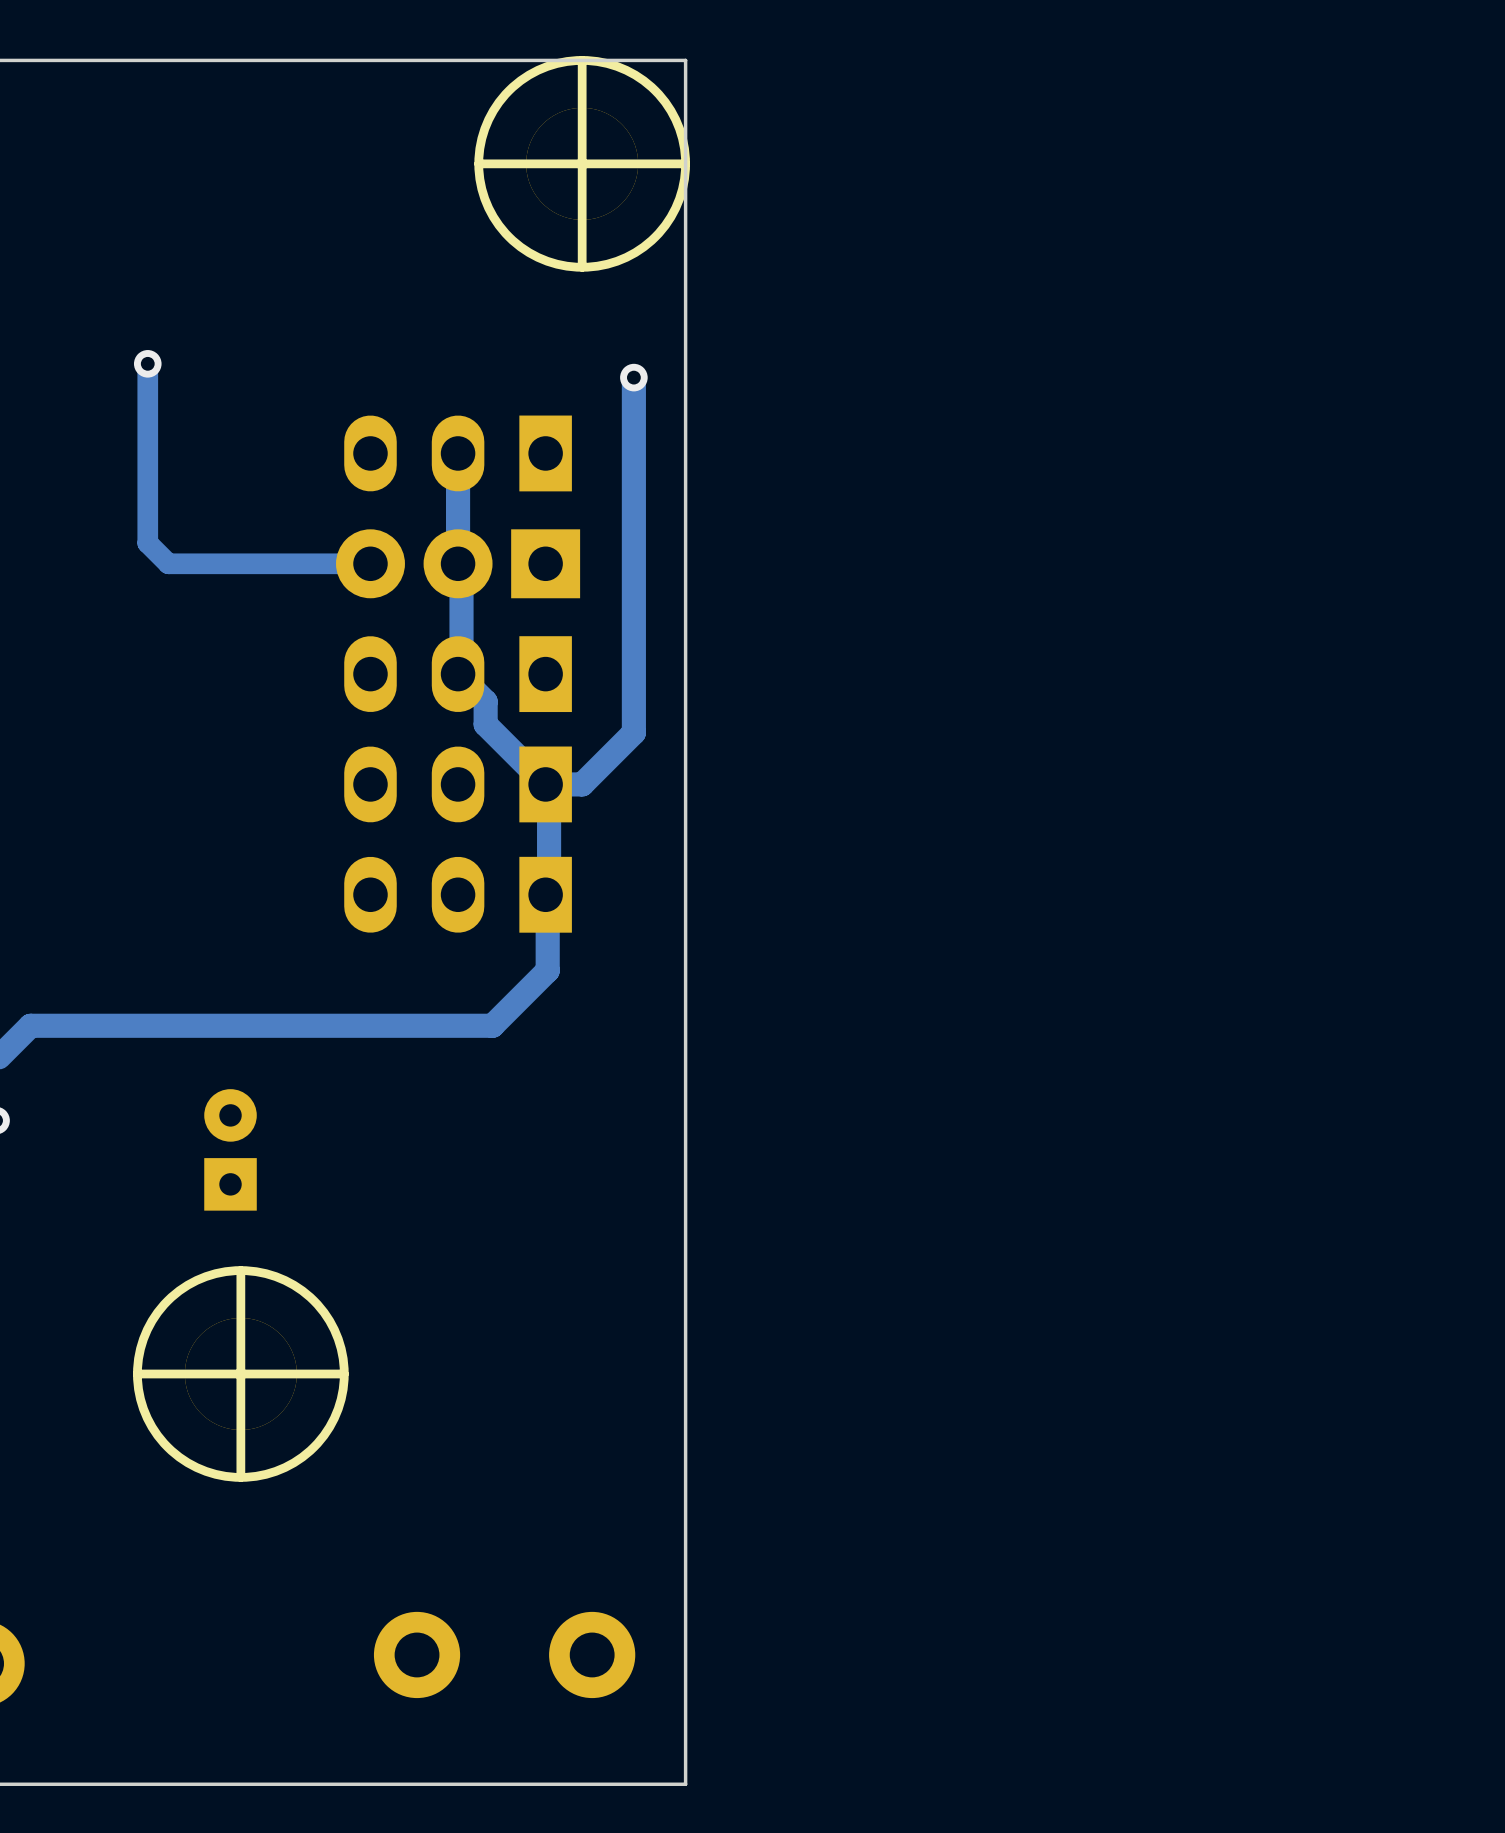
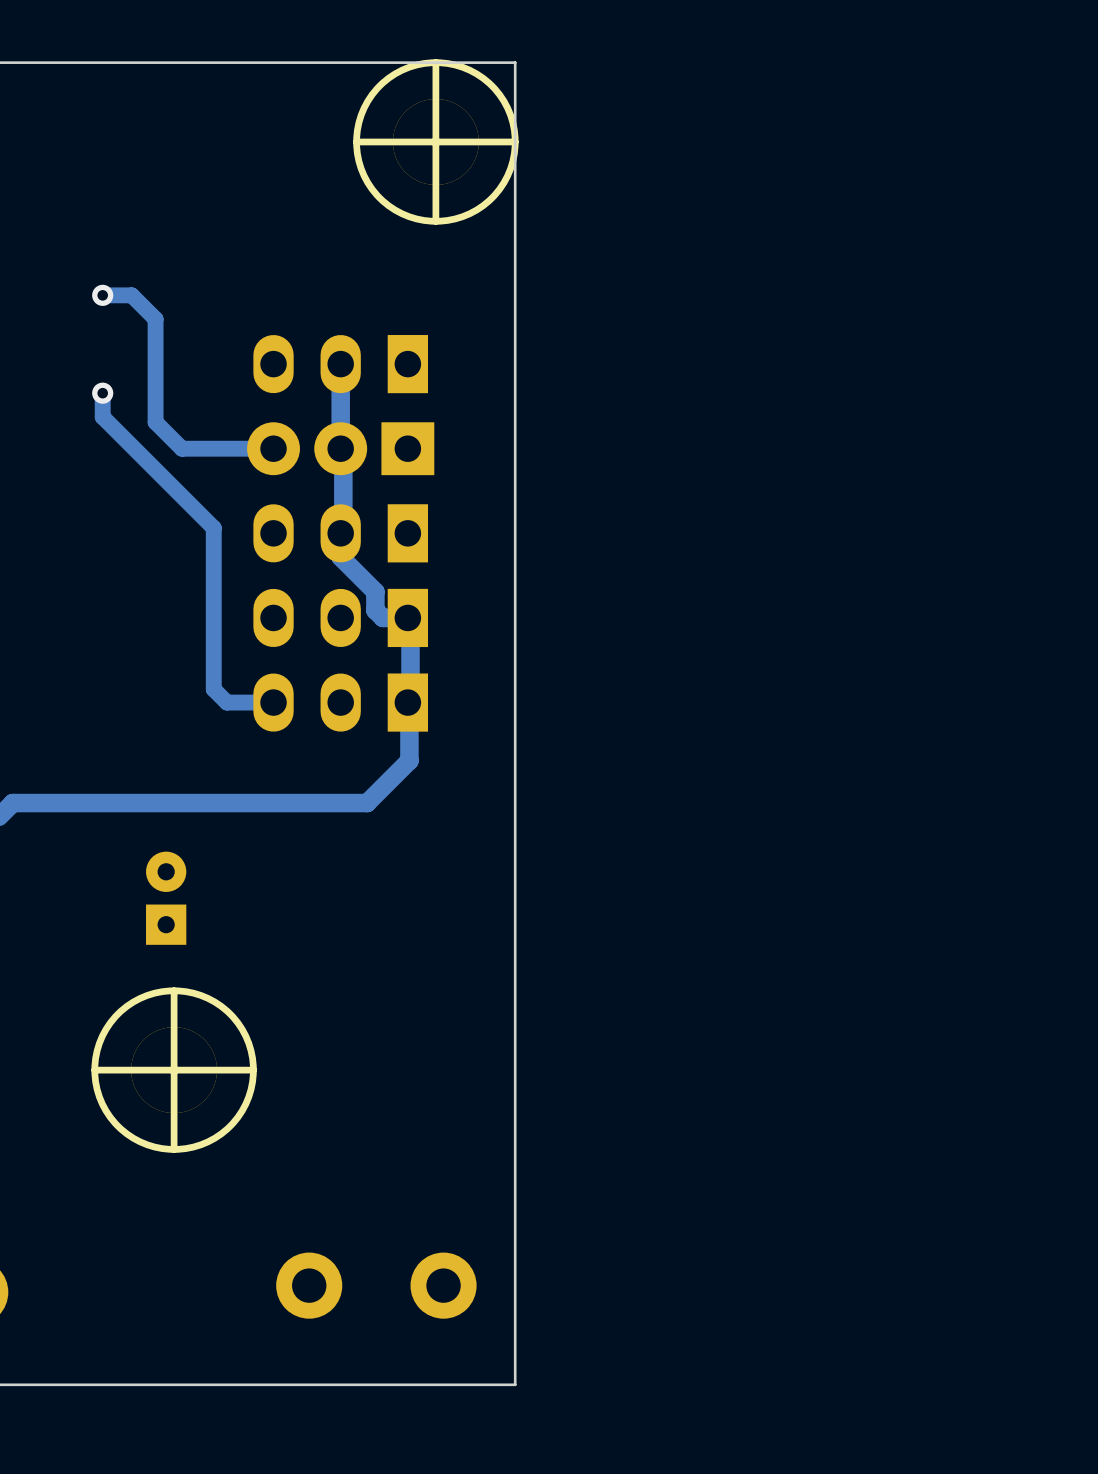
track: (147, 363) (147, 491) -> (102, 295) (131, 295) (155, 319) (155, 422) (182, 448)
track: (633, 377) (633, 732) (582, 784) (545, 784) (485, 724) (485, 701) (458, 674) -> (407, 617) (383, 617) (375, 610) (375, 591) (340, 557) (340, 533)
via: (633, 377) -> none
via: none -> (102, 393)
track: (147, 522) (147, 543) (168, 563) (251, 563) -> (102, 416) (213, 528) (213, 689) (226, 702) (273, 702)

